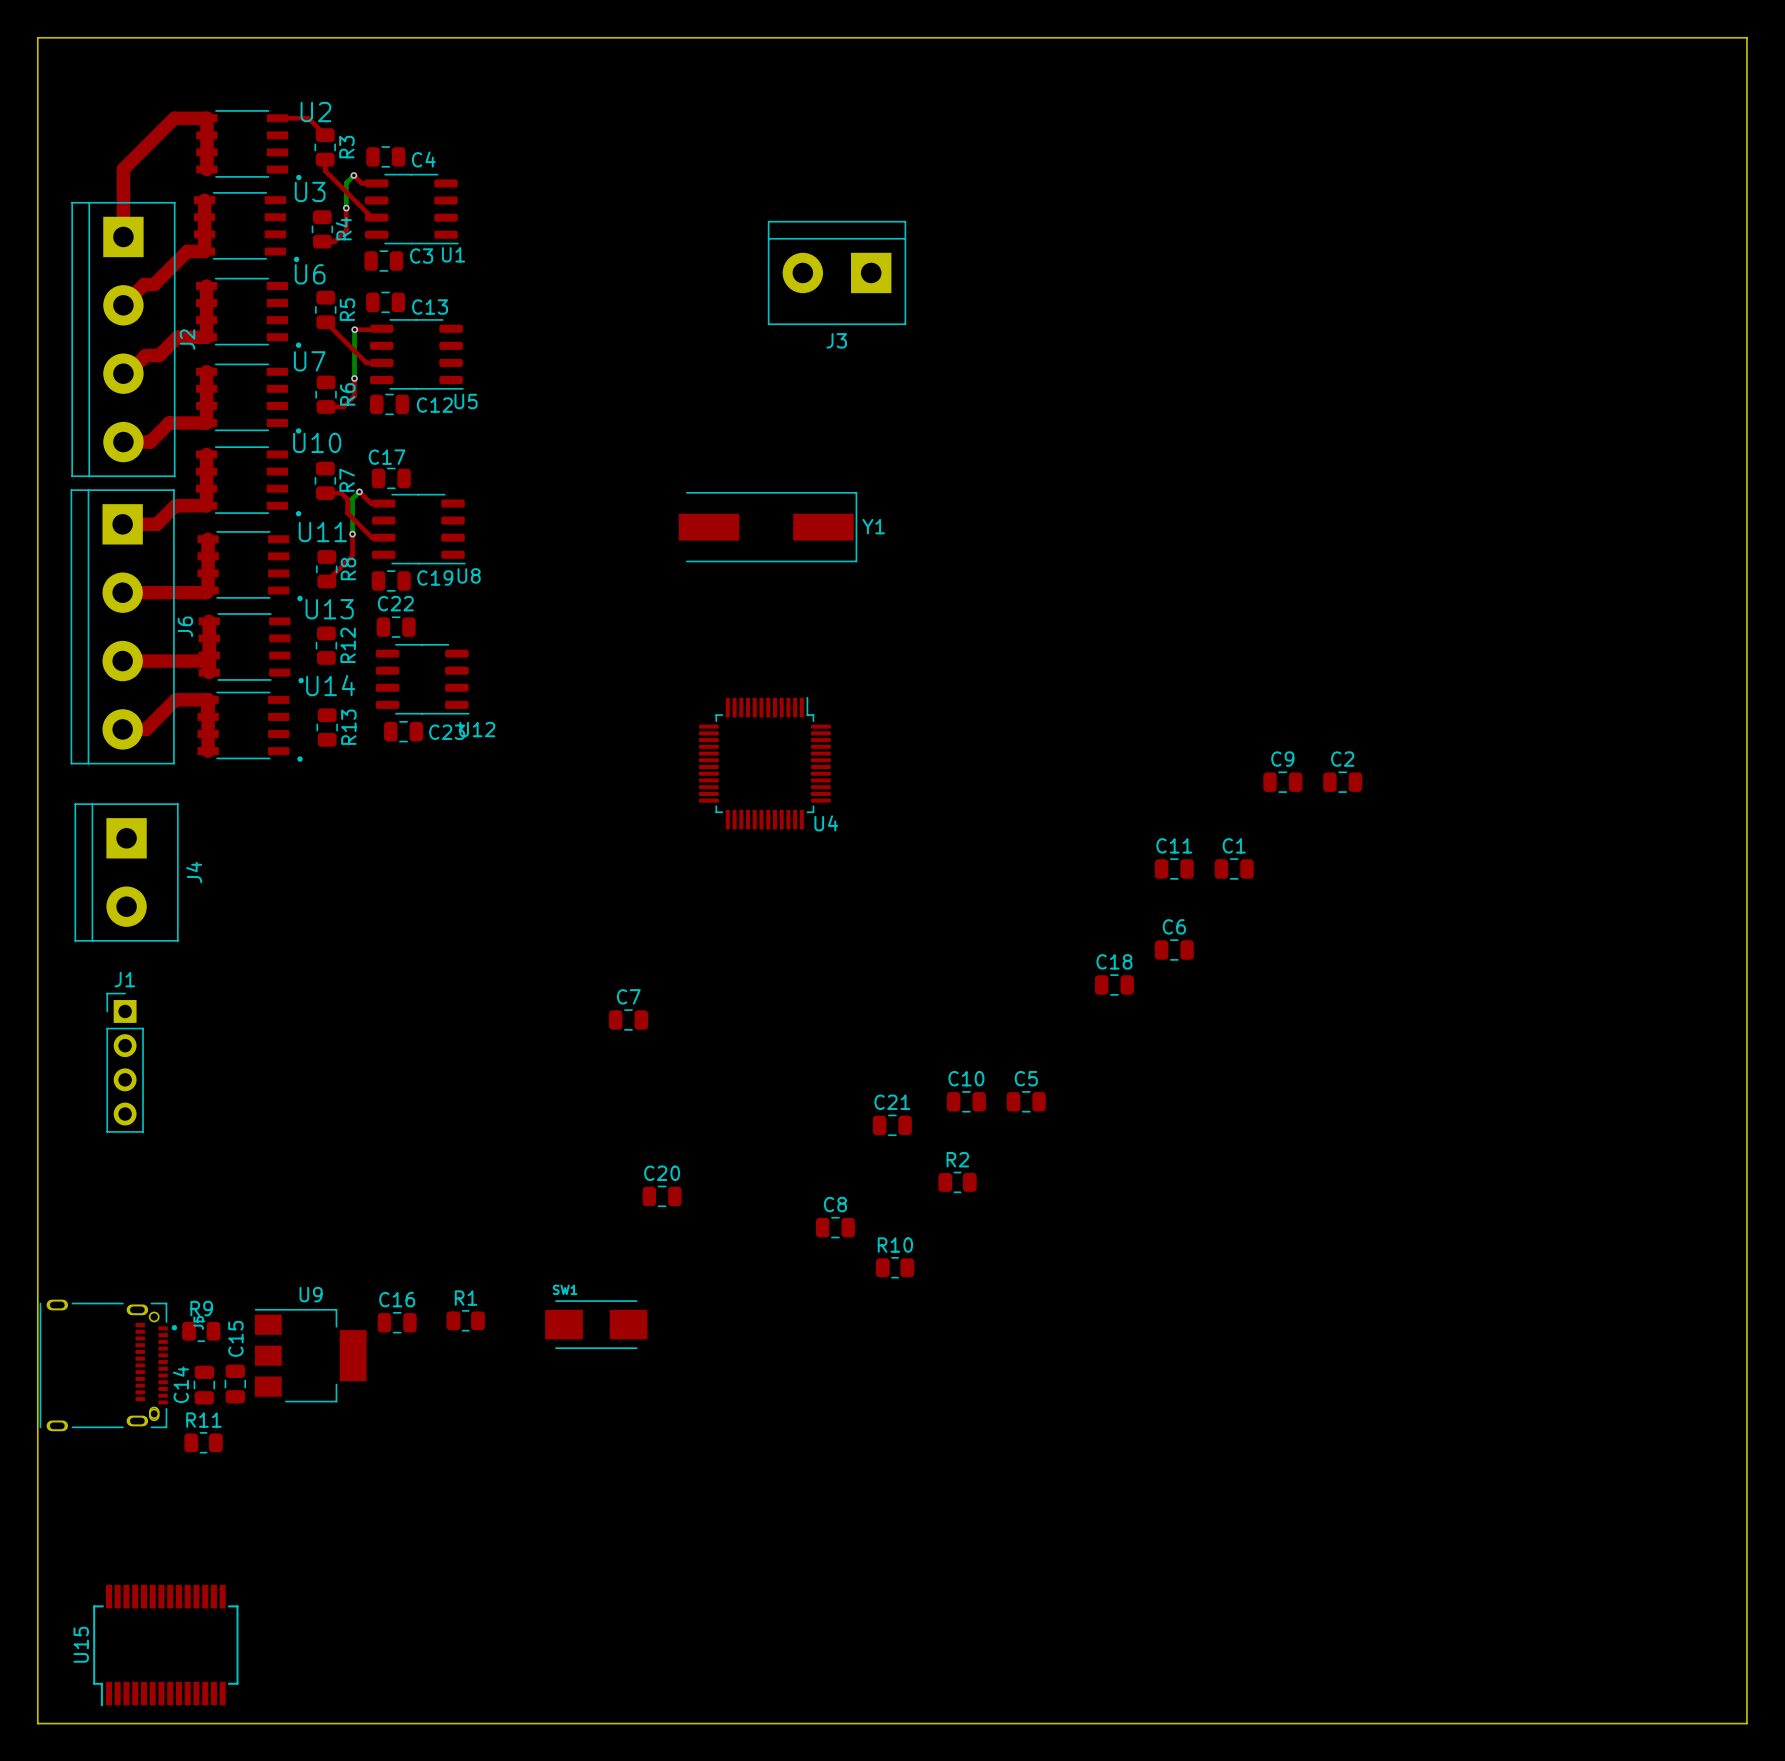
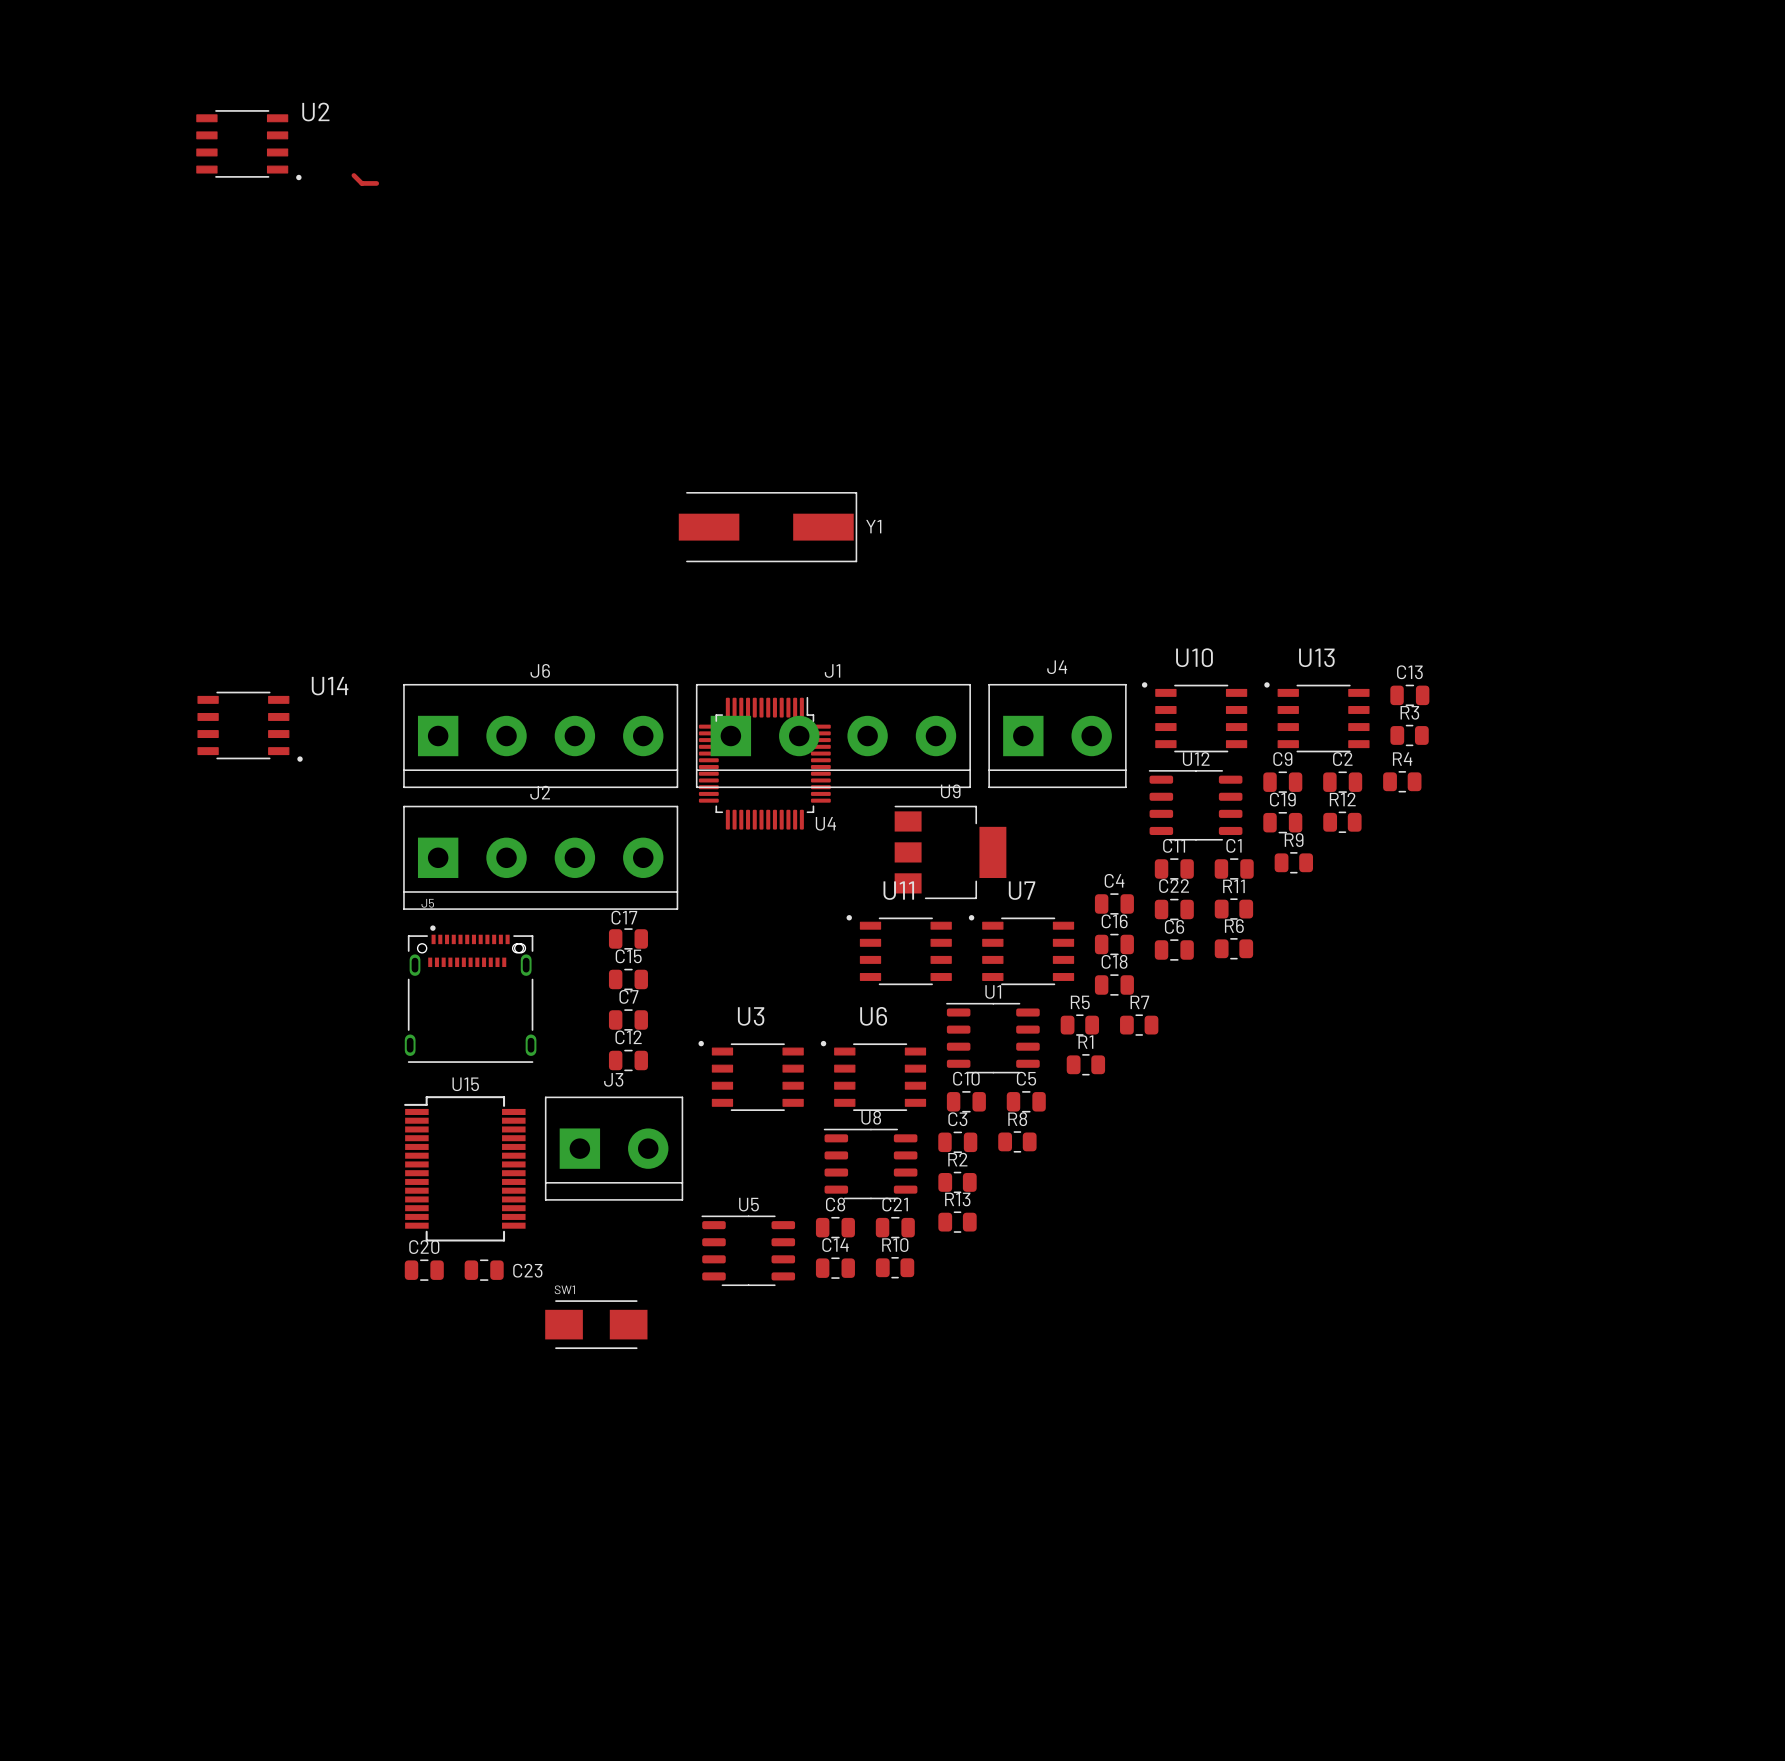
board edge: (37, 37) (1746, 37) (1746, 1723) (37, 1723) (37, 37) -> none
top track: (277, 118) (308, 118) (325, 135) -> none
R3 rotation: 0° (325, 147) -> 90° clockwise (1409, 735)
R3 position: (325, 147) -> (1409, 735)
R3 name position: R3 (346, 147) -> R3 (1409, 712)
C4 position: (385, 156) -> (1114, 903)
top track: (325, 159) (325, 170) (372, 217) (376, 217) -> none
C4 name position: C4 (423, 159) -> C4 (1114, 880)
top track: (206, 169) (206, 118) (174, 118) (123, 169) (123, 236) -> none
bottom track: (353, 175) (346, 183) (346, 208) -> none
via: (353, 175) -> none
U3 name position: U3 (310, 191) -> U3 (751, 1016)
top track: (204, 200) (204, 251) (187, 251) (154, 284) (144, 284) (123, 305) -> none
top track: (346, 208) (346, 230) (334, 241) (322, 241) -> none
via: (346, 208) -> none
U1 rotation: 0° (411, 209) -> 180° (992, 1038)
U1 position: (411, 209) -> (992, 1038)
U3 rotation: 0° (246, 227) -> 180° (751, 1075)
U3 position: (246, 227) -> (751, 1075)
R4 name position: R4 (343, 228) -> R4 (1402, 759)
R4 rotation: 0° (322, 229) -> 90° clockwise (1402, 781)
R4 position: (322, 229) -> (1402, 781)
U1 name position: U1 (453, 254) -> U1 (993, 991)
C3 name position: C3 (421, 256) -> C3 (957, 1119)
C3 position: (383, 261) -> (957, 1142)
J3 rotation: 0° (837, 272) -> 180° (614, 1148)
J3 position: (837, 272) -> (614, 1148)
U6 name position: U6 (310, 274) -> U6 (873, 1016)
top track: (206, 285) (206, 337) (177, 337) (159, 355) (145, 355) (127, 373) (123, 373) -> none
C13 position: (385, 302) -> (1409, 695)
C13 name position: C13 (430, 307) -> C13 (1409, 672)
R5 rotation: 0° (325, 309) -> 90° clockwise (1079, 1025)
R5 position: (325, 309) -> (1079, 1025)
R5 name position: R5 (347, 309) -> R5 (1080, 1002)
U6 rotation: 0° (248, 312) -> 180° (873, 1075)
U6 position: (248, 312) -> (873, 1075)
top track: (325, 322) (366, 362) (381, 362) -> none
top track: (381, 328) (354, 329) -> none
bottom track: (354, 329) (354, 378) -> none
via: (354, 329) -> none
J2 rotation: 0° (123, 339) -> 90° counterclockwise (540, 857)
J2 position: (123, 339) -> (540, 857)
U5 rotation: 0° (416, 354) -> 180° (748, 1250)
U5 position: (416, 354) -> (748, 1250)
U7 name position: U7 (309, 361) -> U7 (1022, 890)
top track: (206, 371) (206, 423) (169, 423) (150, 442) (123, 442) -> none
top track: (354, 378) (354, 396) (343, 407) (326, 407) -> none
via: (354, 378) -> none
R6 rotation: 0° (326, 394) -> 90° clockwise (1233, 948)
R6 position: (326, 394) -> (1233, 948)
R6 name position: R6 (347, 394) -> R6 (1234, 926)
U7 rotation: 0° (248, 398) -> 180° (1021, 950)
U7 position: (248, 398) -> (1021, 950)
U5 name position: U5 (466, 401) -> U5 (748, 1204)
C12 position: (389, 404) -> (628, 1060)
C12 name position: C12 (434, 405) -> C12 (628, 1037)
U10 name position: U10 (317, 442) -> U10 (1194, 657)
top track: (206, 454) (206, 505) (175, 505) (156, 524) (122, 524) -> none
C17 position: (391, 478) -> (628, 938)
R7 rotation: 0° (325, 480) -> 90° clockwise (1139, 1025)
R7 position: (325, 480) -> (1139, 1025)
R7 name position: R7 (347, 480) -> R7 (1139, 1002)
U10 rotation: 0° (248, 481) -> 180° (1194, 717)
U10 position: (248, 481) -> (1194, 717)
top track: (359, 491) (371, 503) (383, 503) -> none
bottom track: (359, 491) (352, 498) (352, 534) -> none
via: (359, 491) -> none
top track: (325, 493) (341, 493) (347, 499) (347, 513) (372, 537) (383, 537) -> none
U8 rotation: 0° (418, 529) -> 180° (870, 1163)
U8 position: (418, 529) -> (870, 1163)
U11 name position: U11 (322, 532) -> U11 (898, 890)
top track: (352, 534) (352, 555) (326, 581) -> none
via: (352, 534) -> none
top track: (208, 539) (208, 590) (205, 592) (122, 592) -> none
U11 rotation: 0° (250, 566) -> 180° (899, 950)
U11 position: (250, 566) -> (899, 950)
R8 name position: R8 (348, 568) -> R8 (1017, 1119)
R8 rotation: 0° (326, 569) -> 90° clockwise (1017, 1141)
R8 position: (326, 569) -> (1017, 1141)
U8 name position: U8 (469, 575) -> U8 (871, 1117)
C19 name position: C19 (435, 577) -> C19 (1282, 799)
C19 position: (391, 580) -> (1282, 822)
U13 name position: U13 (329, 609) -> U13 (1316, 657)
top track: (209, 621) (209, 672) -> none
J6 rotation: 0° (122, 626) -> 90° counterclockwise (540, 736)
J6 position: (122, 626) -> (540, 736)
C22 position: (396, 627) -> (1174, 909)
R12 rotation: 0° (326, 645) -> 90° clockwise (1342, 822)
R12 position: (326, 645) -> (1342, 822)
R12 name position: R12 (348, 645) -> R12 (1342, 799)
U13 rotation: 0° (251, 648) -> 180° (1316, 717)
U13 position: (251, 648) -> (1316, 717)
top track: (209, 655) (203, 661) (122, 661) -> none
U12 rotation: 0° (422, 679) -> 180° (1195, 805)
U12 position: (422, 679) -> (1195, 805)
R13 rotation: 0° (327, 727) -> 90° clockwise (957, 1222)
R13 position: (327, 727) -> (957, 1222)
R13 name position: R13 (348, 727) -> R13 (957, 1199)
top track: (122, 729) (146, 729) (175, 699) (208, 699) (208, 751) -> none
U12 name position: U12 (477, 729) -> U12 (1196, 759)
C23 position: (403, 731) -> (484, 1270)
J4 rotation: 0° (126, 872) -> 90° counterclockwise (1057, 736)
J4 position: (126, 872) -> (1057, 736)
J1 footprint: [106, 992, 144, 1133] -> [695, 683, 971, 789]
C21 position: (892, 1125) -> (895, 1227)
C20 position: (662, 1196) -> (424, 1270)
R1 position: (465, 1320) -> (1085, 1064)
C16 position: (397, 1322) -> (1114, 944)
R9 position: (201, 1331) -> (1293, 862)
U9 position: (310, 1355) -> (950, 852)
J5 rotation: 0° (108, 1365) -> 90° counterclockwise (470, 994)
J5 position: (108, 1365) -> (470, 994)
C15 rotation: 0° (235, 1384) -> 90° clockwise (628, 979)
C15 position: (235, 1384) -> (628, 979)
C14 rotation: 0° (204, 1385) -> 90° clockwise (835, 1268)
C14 position: (204, 1385) -> (835, 1268)
R11 position: (203, 1442) -> (1233, 909)
U15 rotation: 0° (165, 1645) -> 90° clockwise (464, 1168)
U15 position: (165, 1645) -> (464, 1168)

